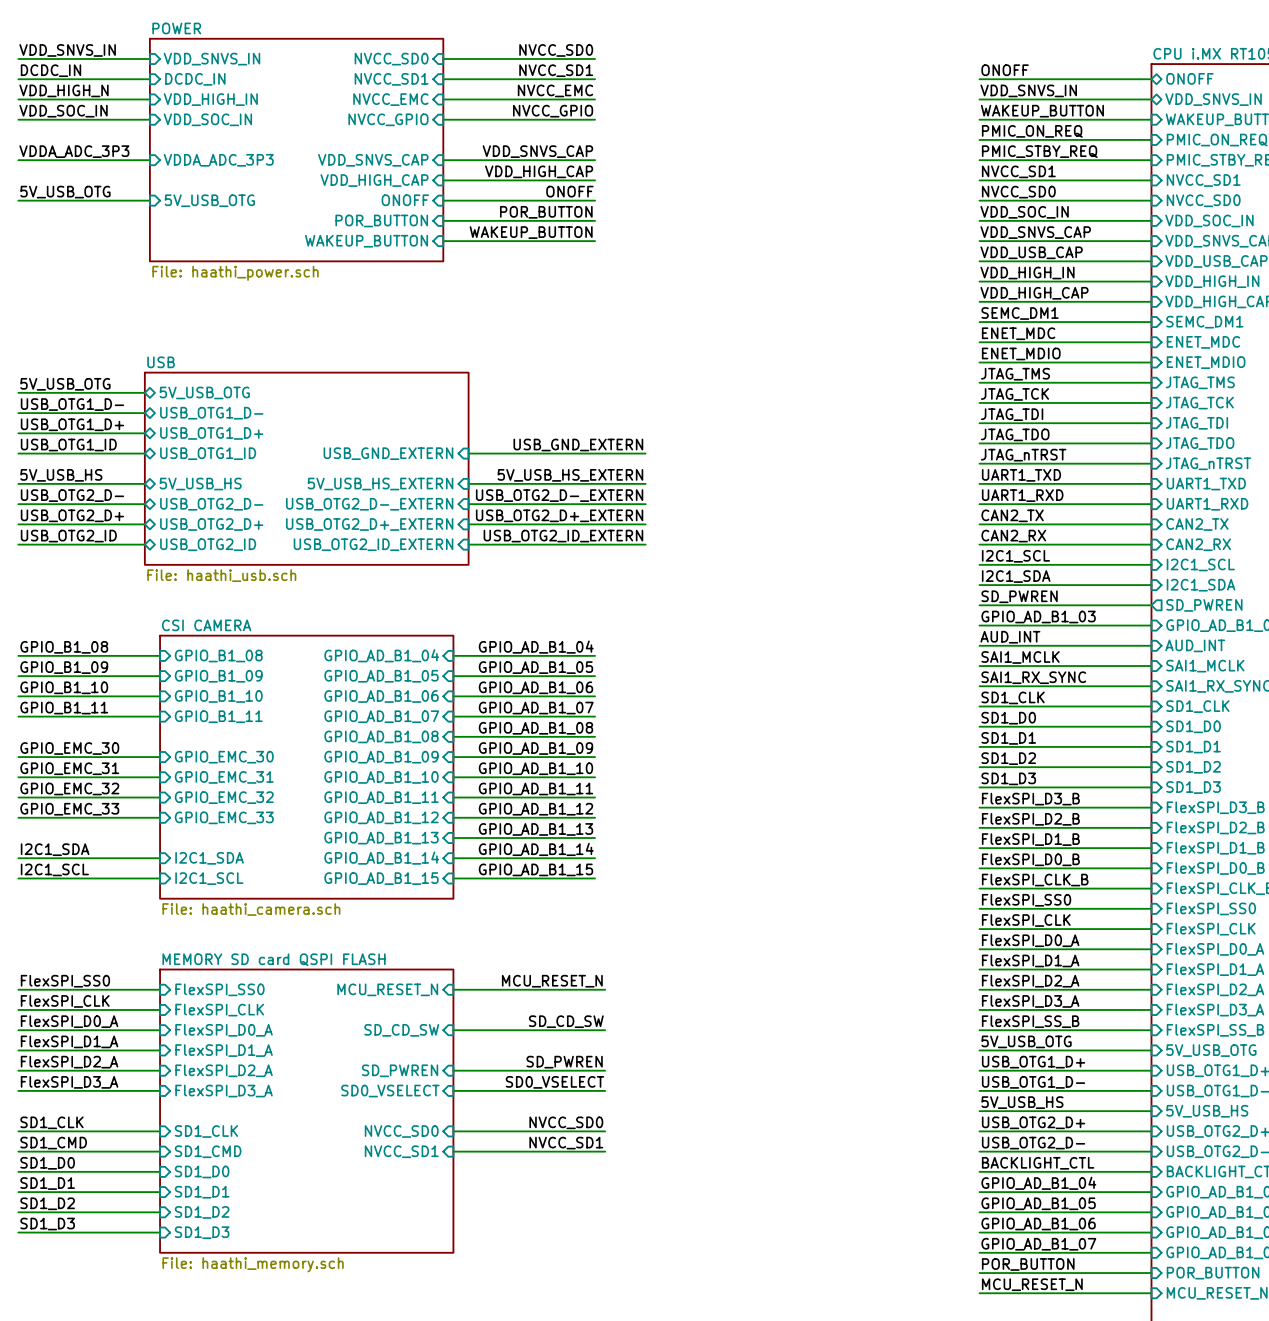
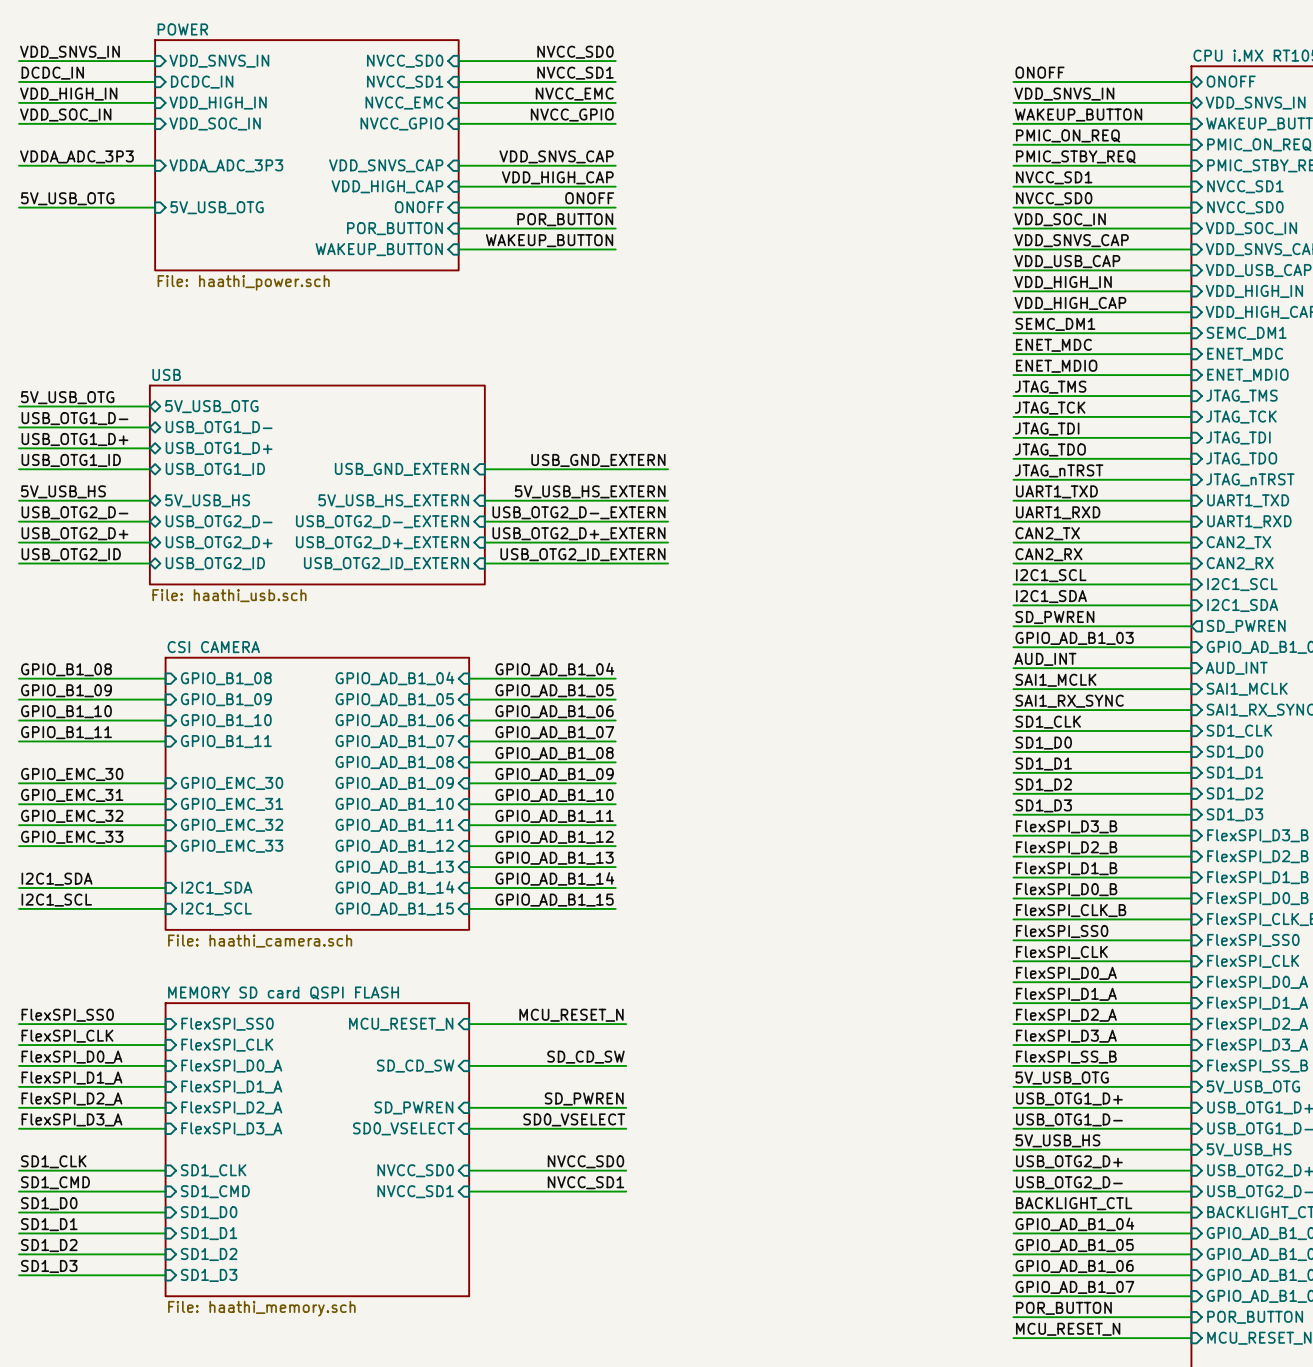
label: VDD_HIGH_N (64, 90) -> VDD_HIGH_IN (68, 94)

